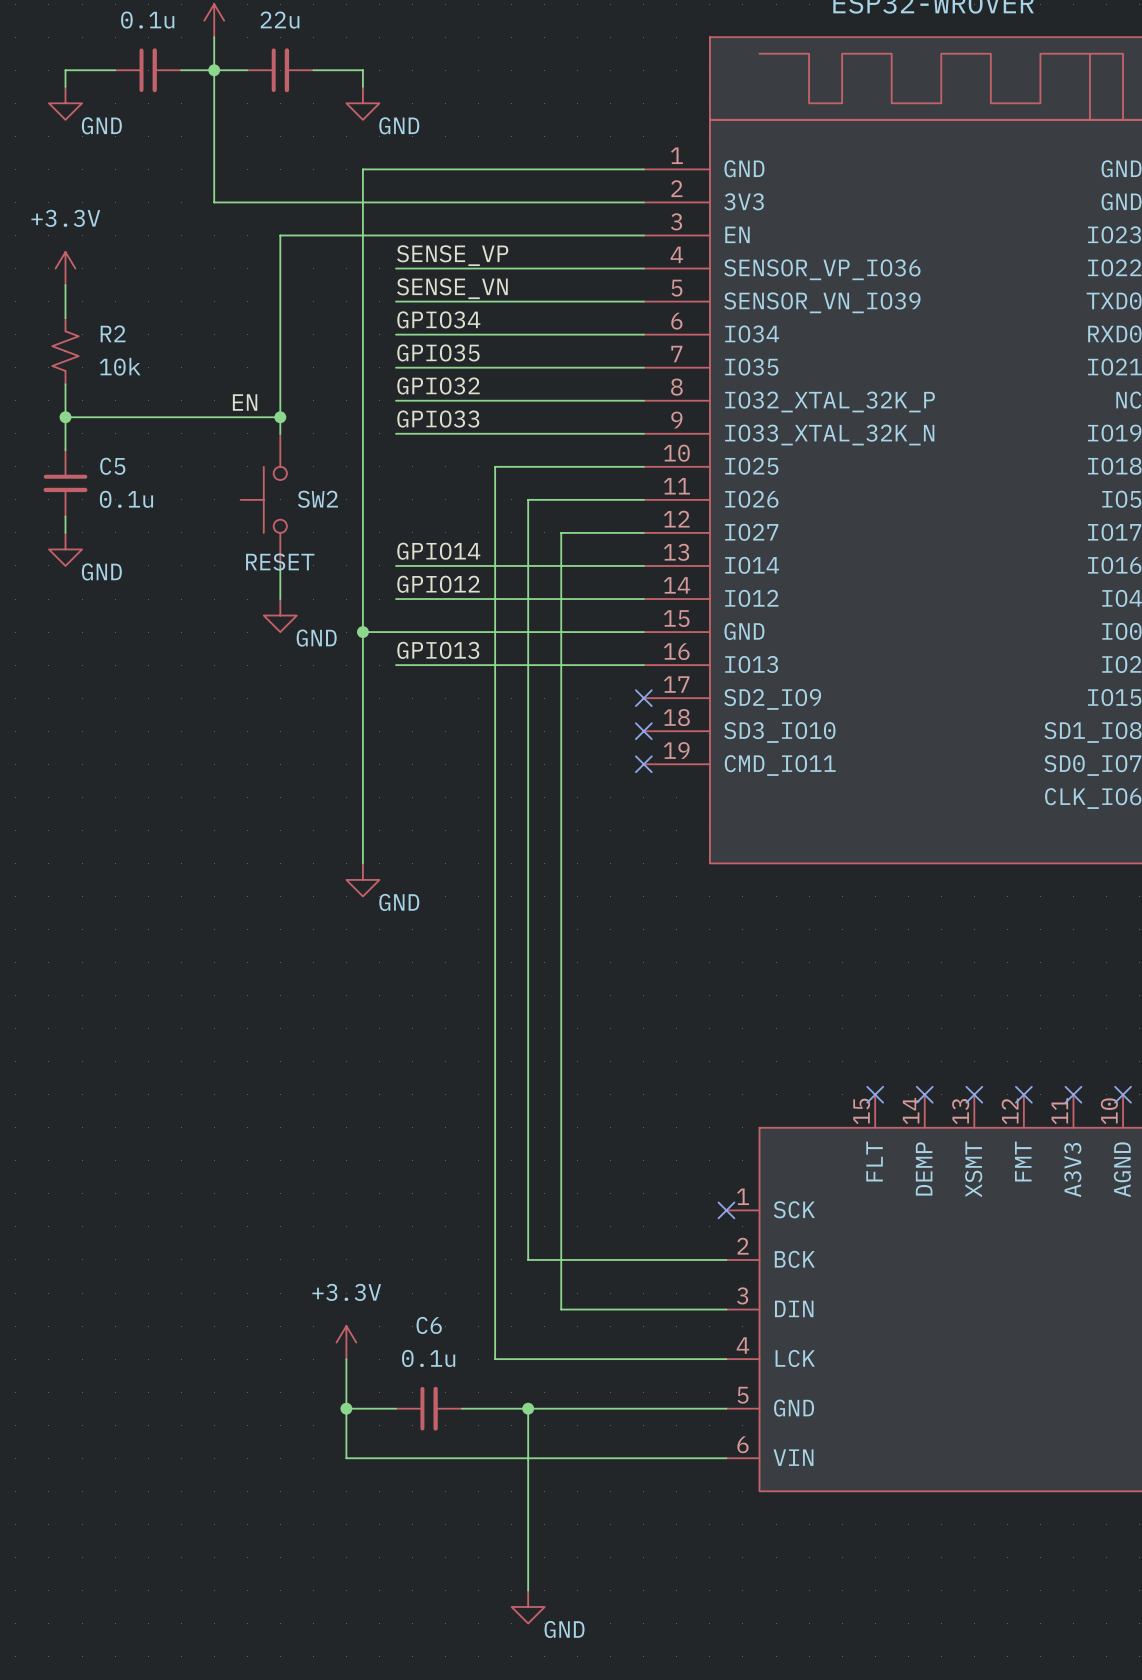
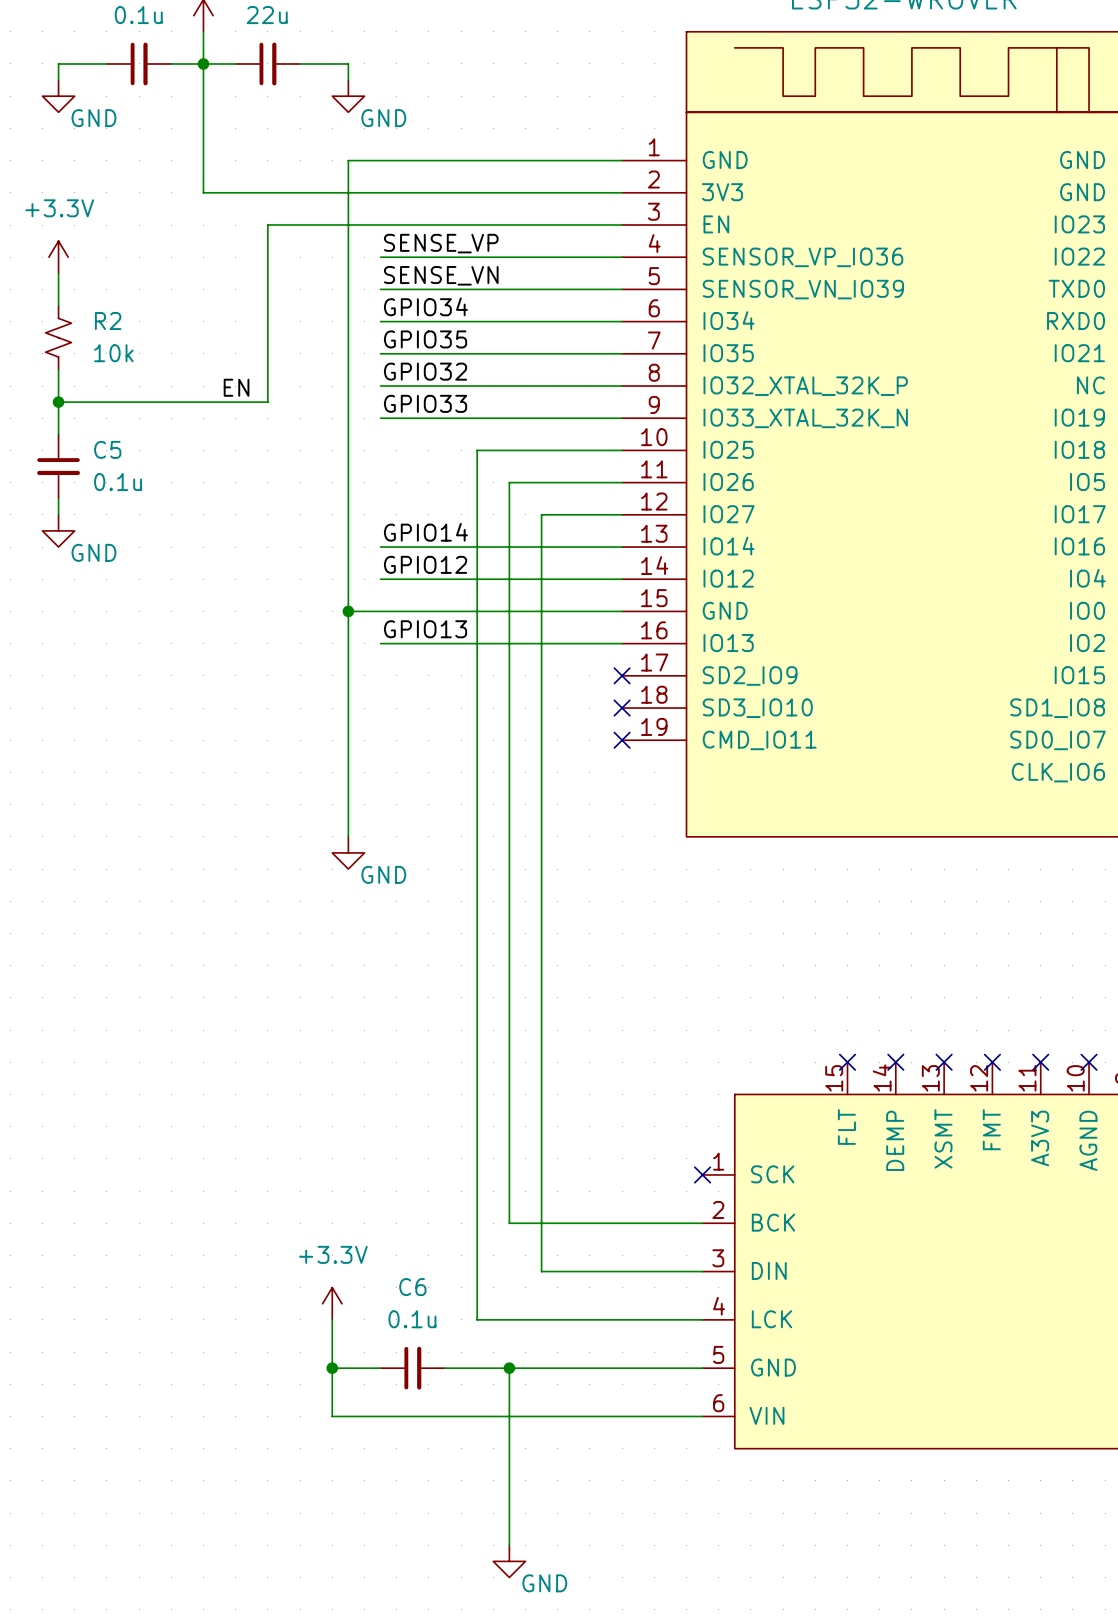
wire: (280, 417) (280, 433) -> none
junction: (280, 417) -> none
SW2: RESET (263, 499) -> none
wire: (280, 565) (280, 599) -> none
power symbol: GND (280, 615) -> none

